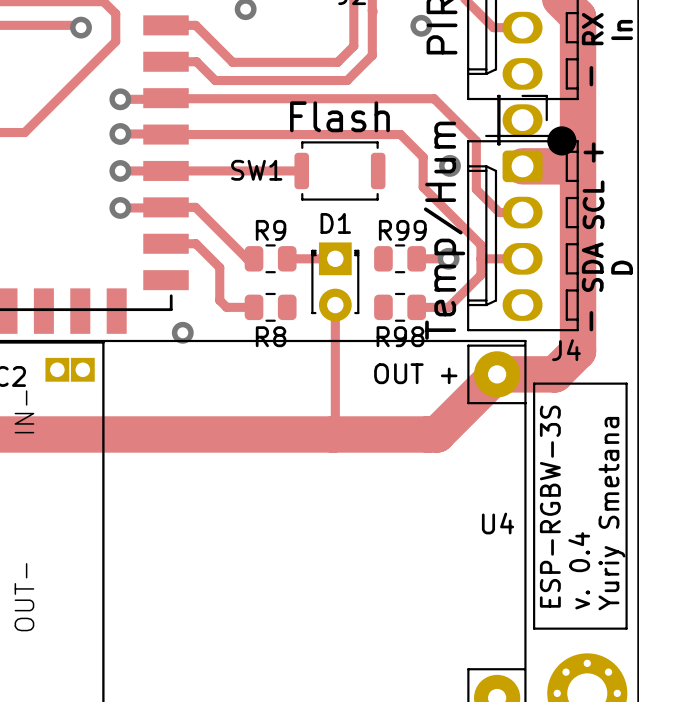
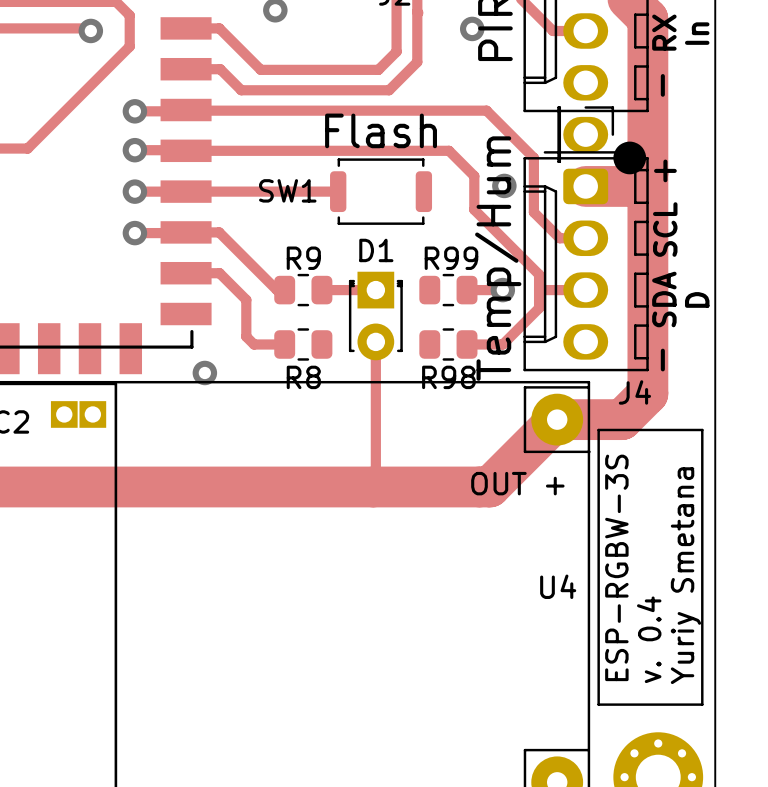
U4 text position: OUT + (415, 373) -> OUT + (517, 483)
part text: IN- (24, 411) -> none
part text: OUT- (24, 597) -> none

